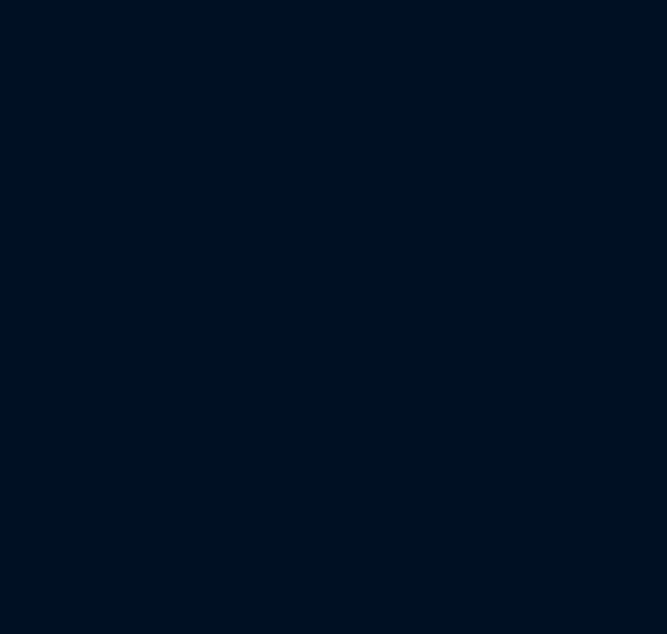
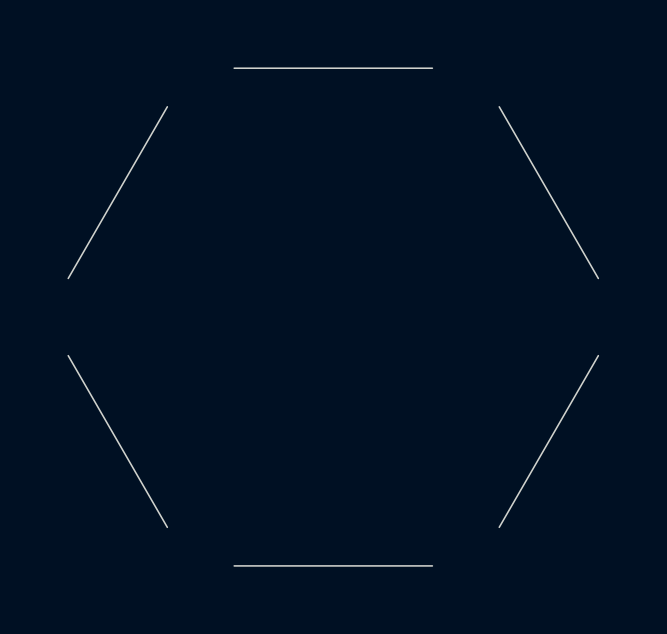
drawing: none -> [67, 67, 600, 567]

